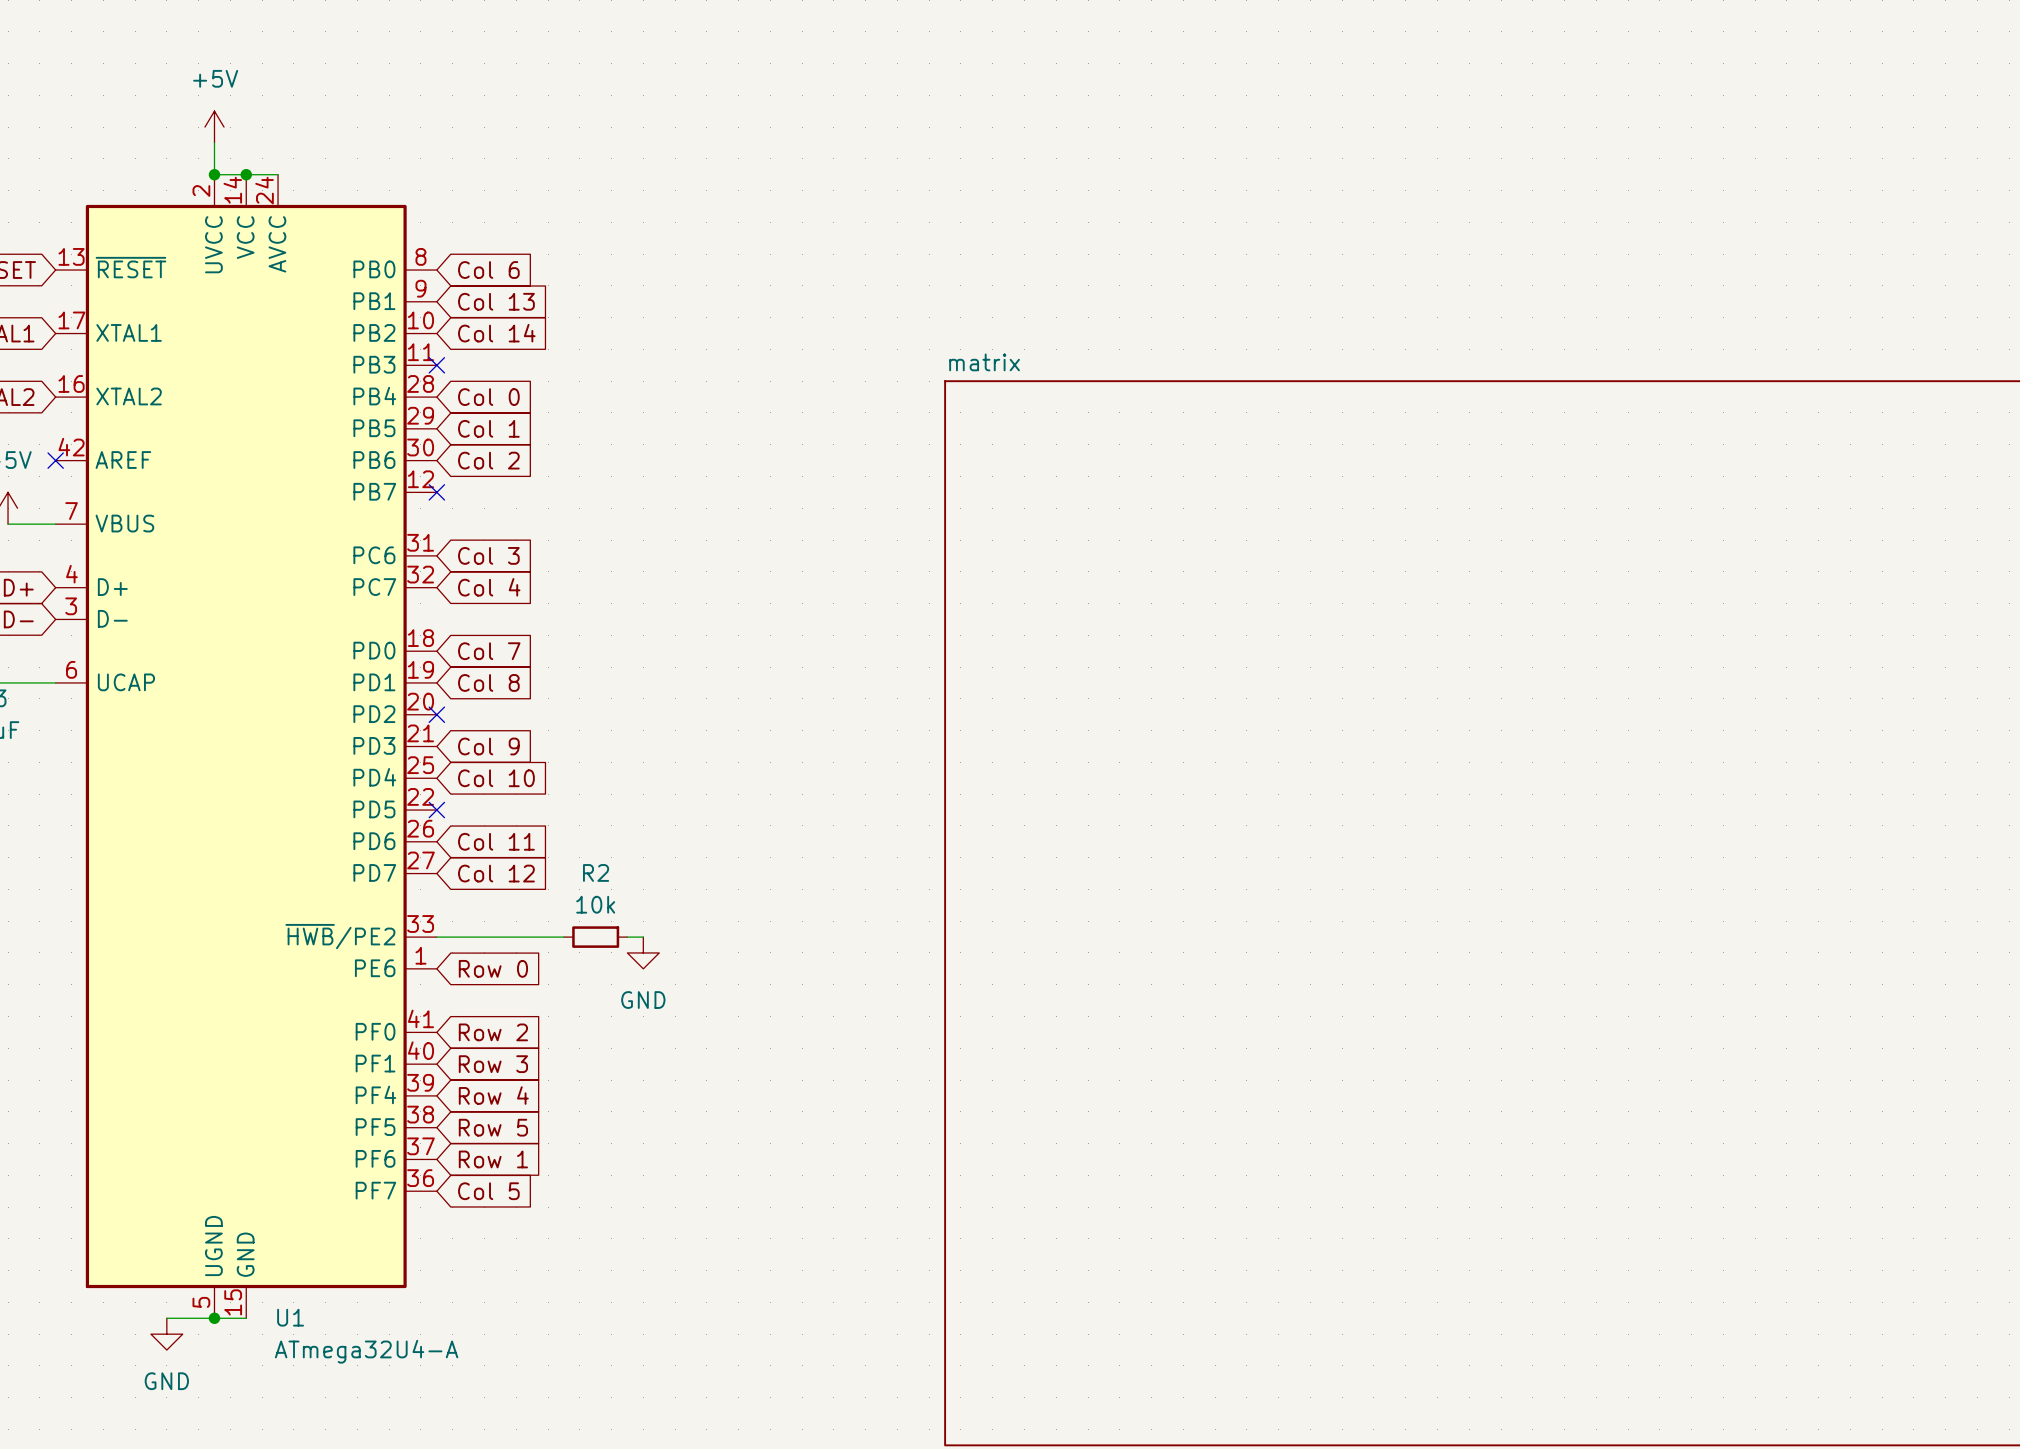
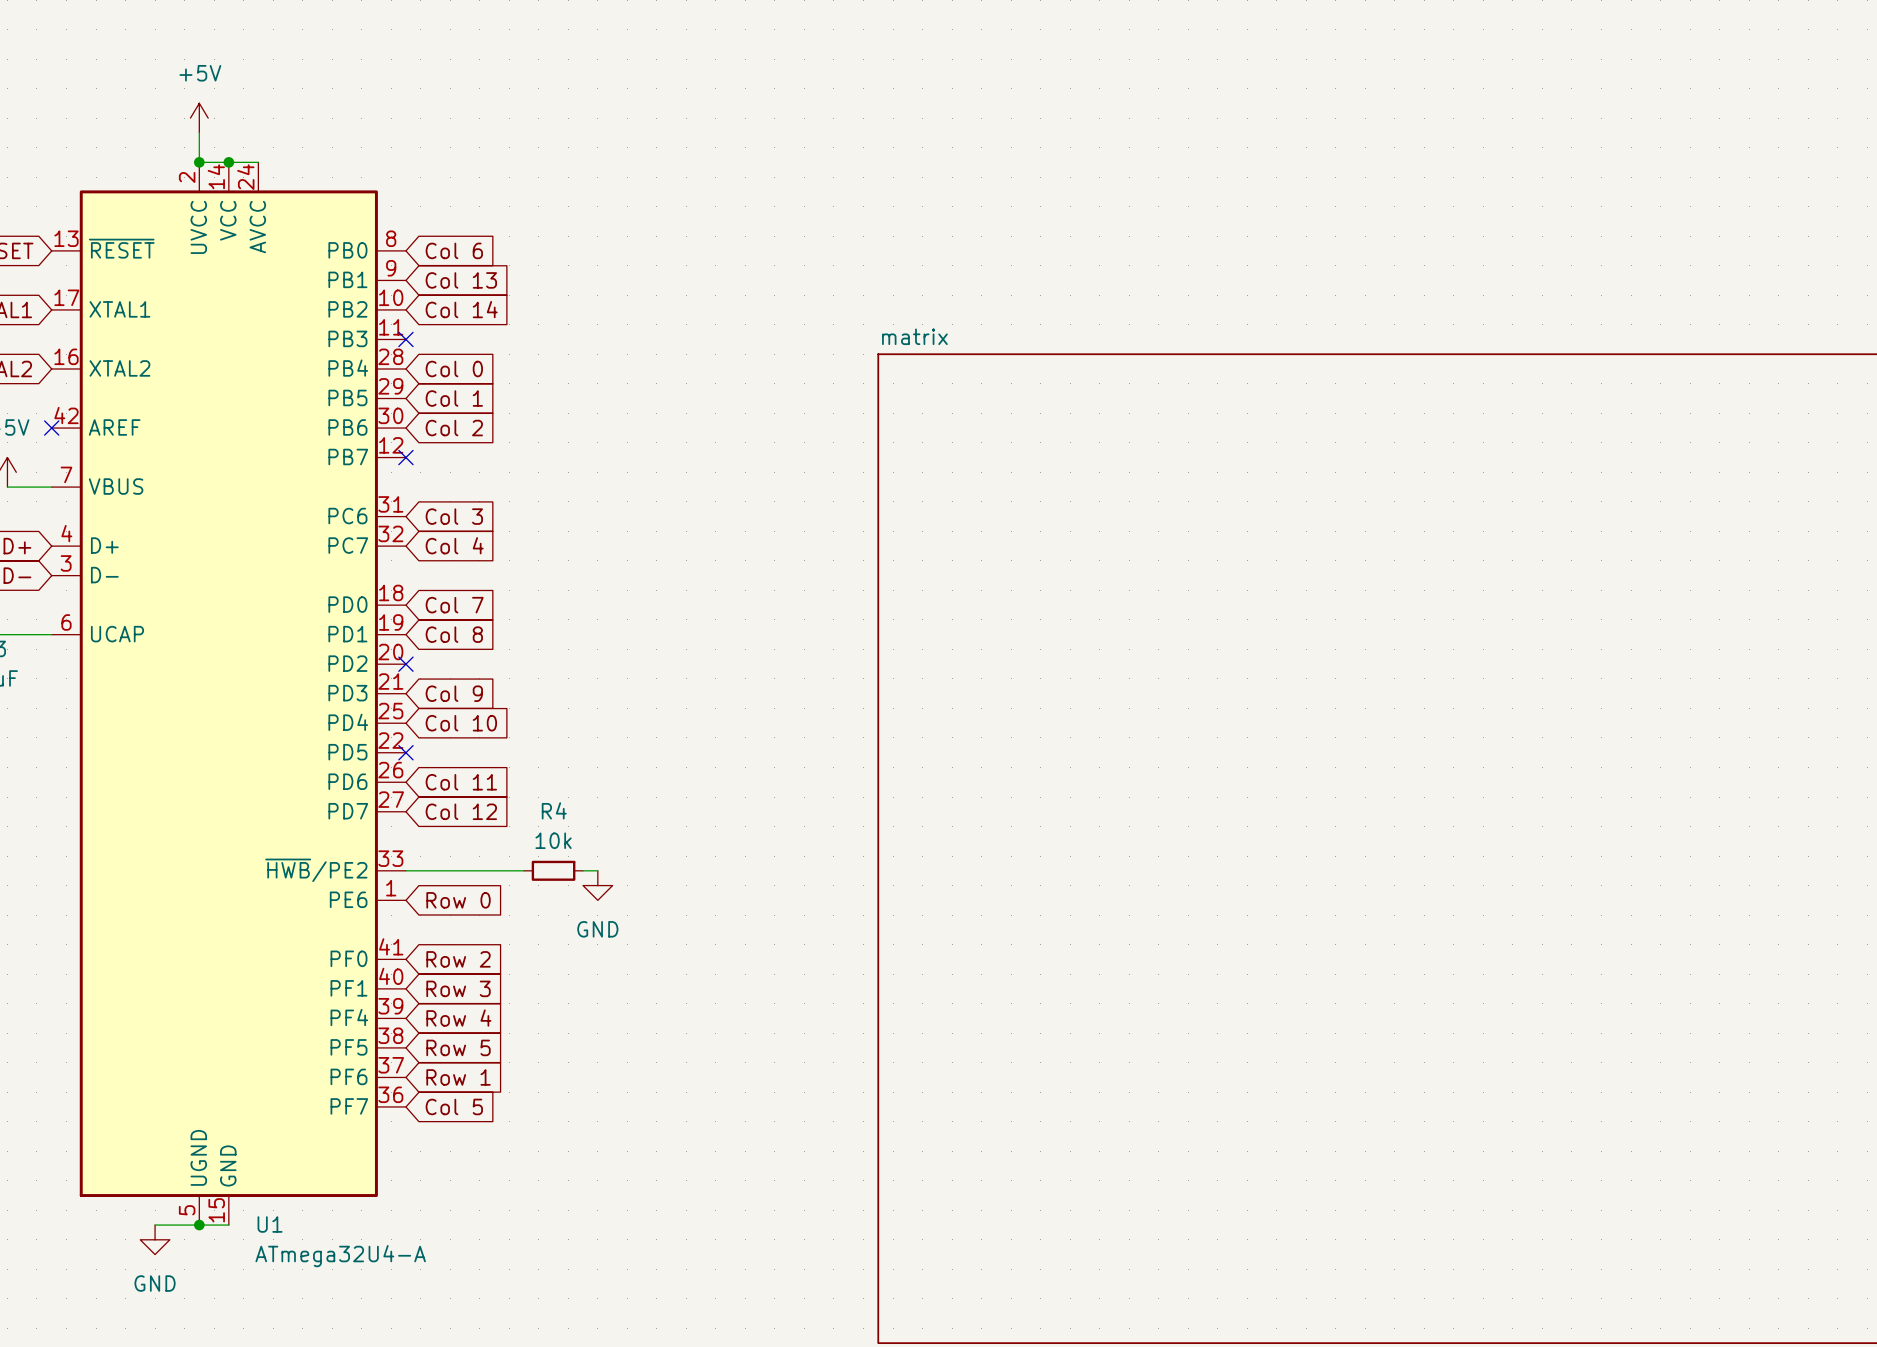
R2 name: R2 (596, 872) -> R4 (554, 810)

